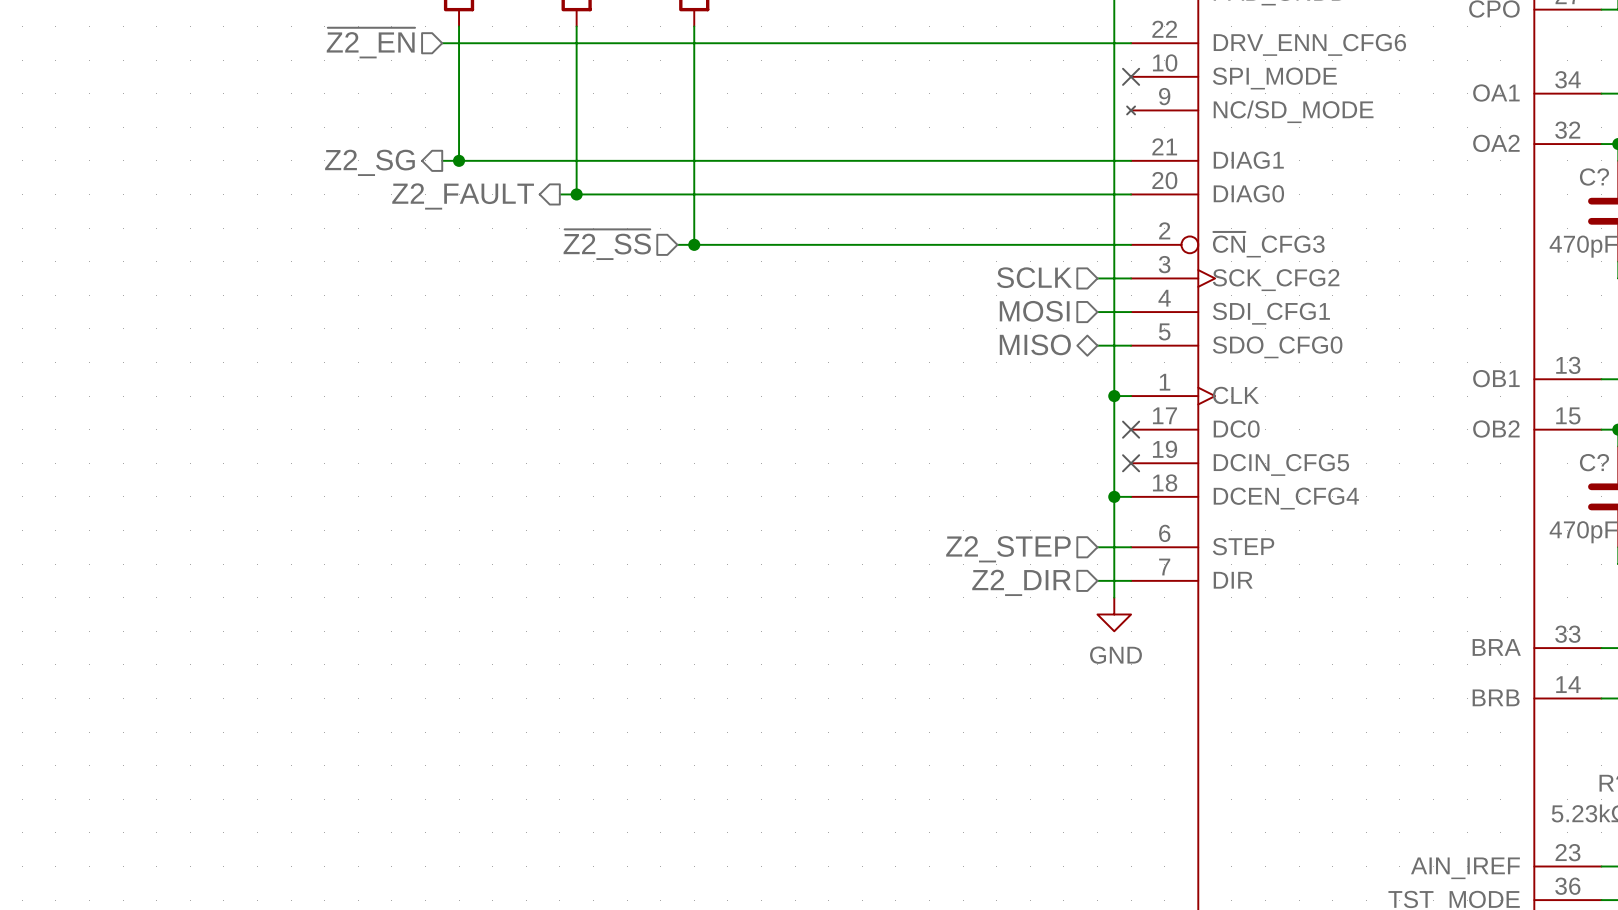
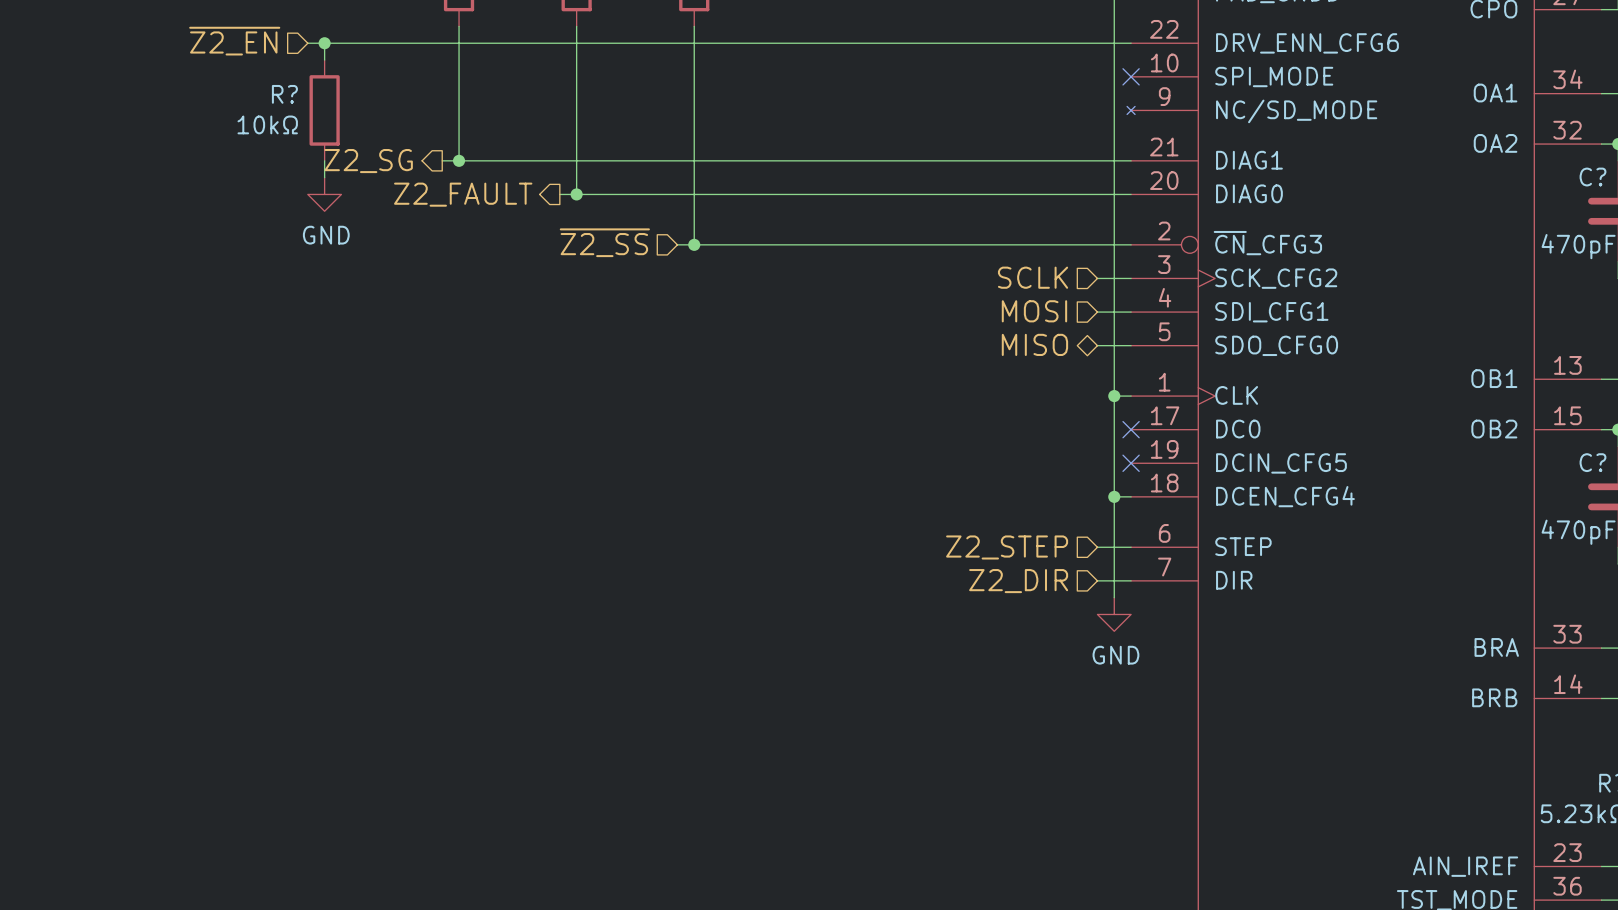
wire: none -> (307, 43) (442, 43)
wire: none -> (324, 43) (324, 60)
junction: none -> (324, 43)
hierarchical label position: ~{Z2_EN} (370, 43) -> ~{Z2_EN} (234, 41)
R?: none -> 10kΩ (324, 110)
wire: none -> (324, 160) (324, 177)
power symbol: none -> GND (324, 194)

